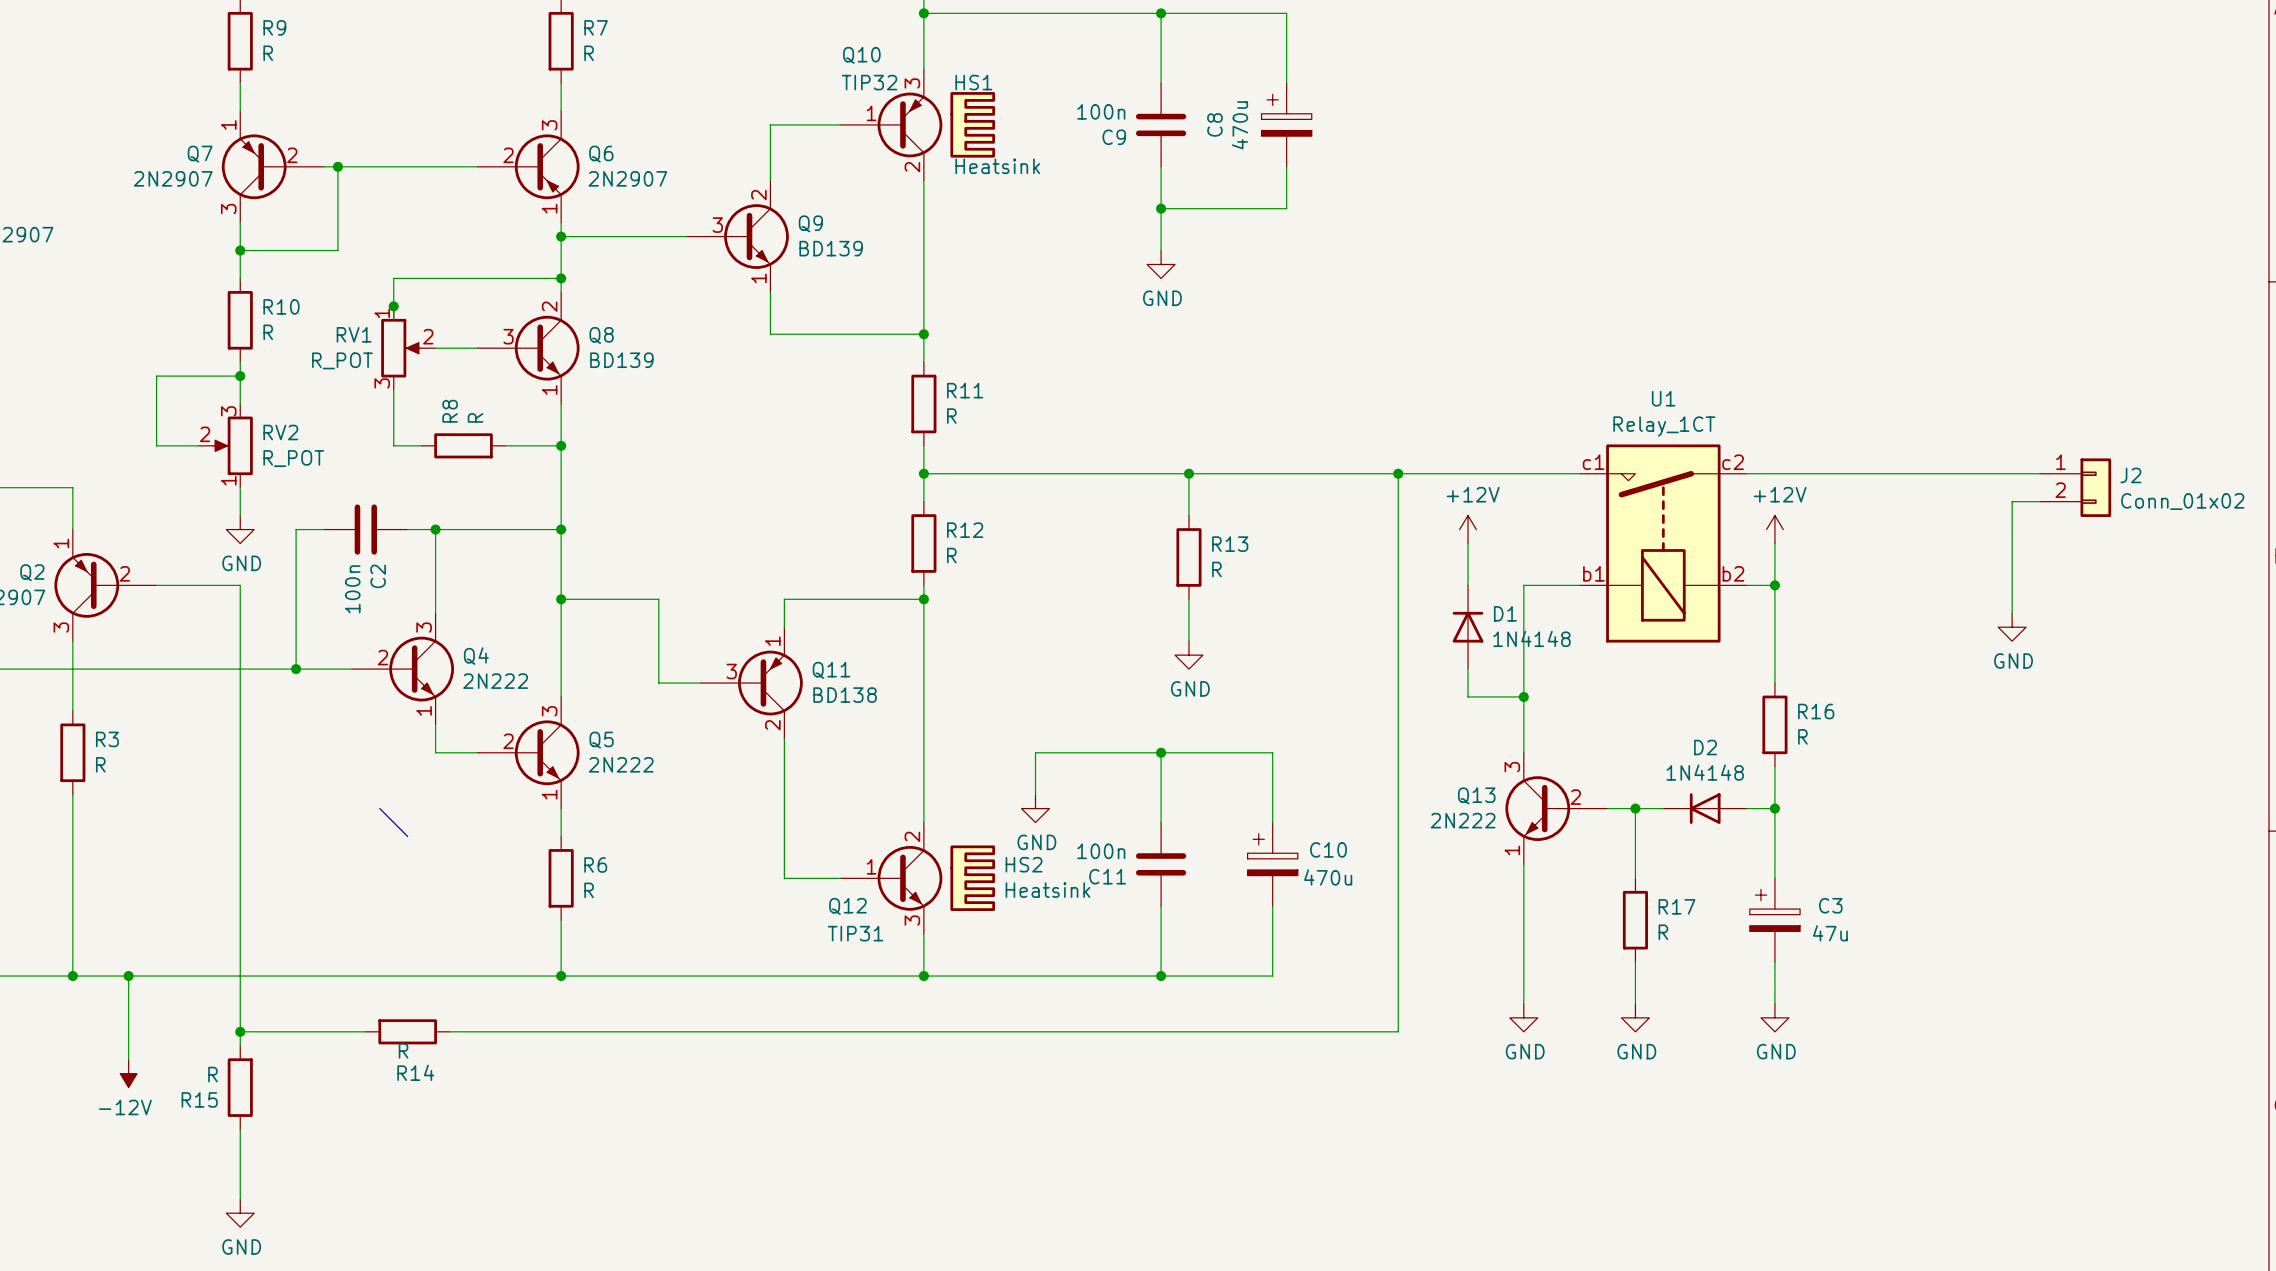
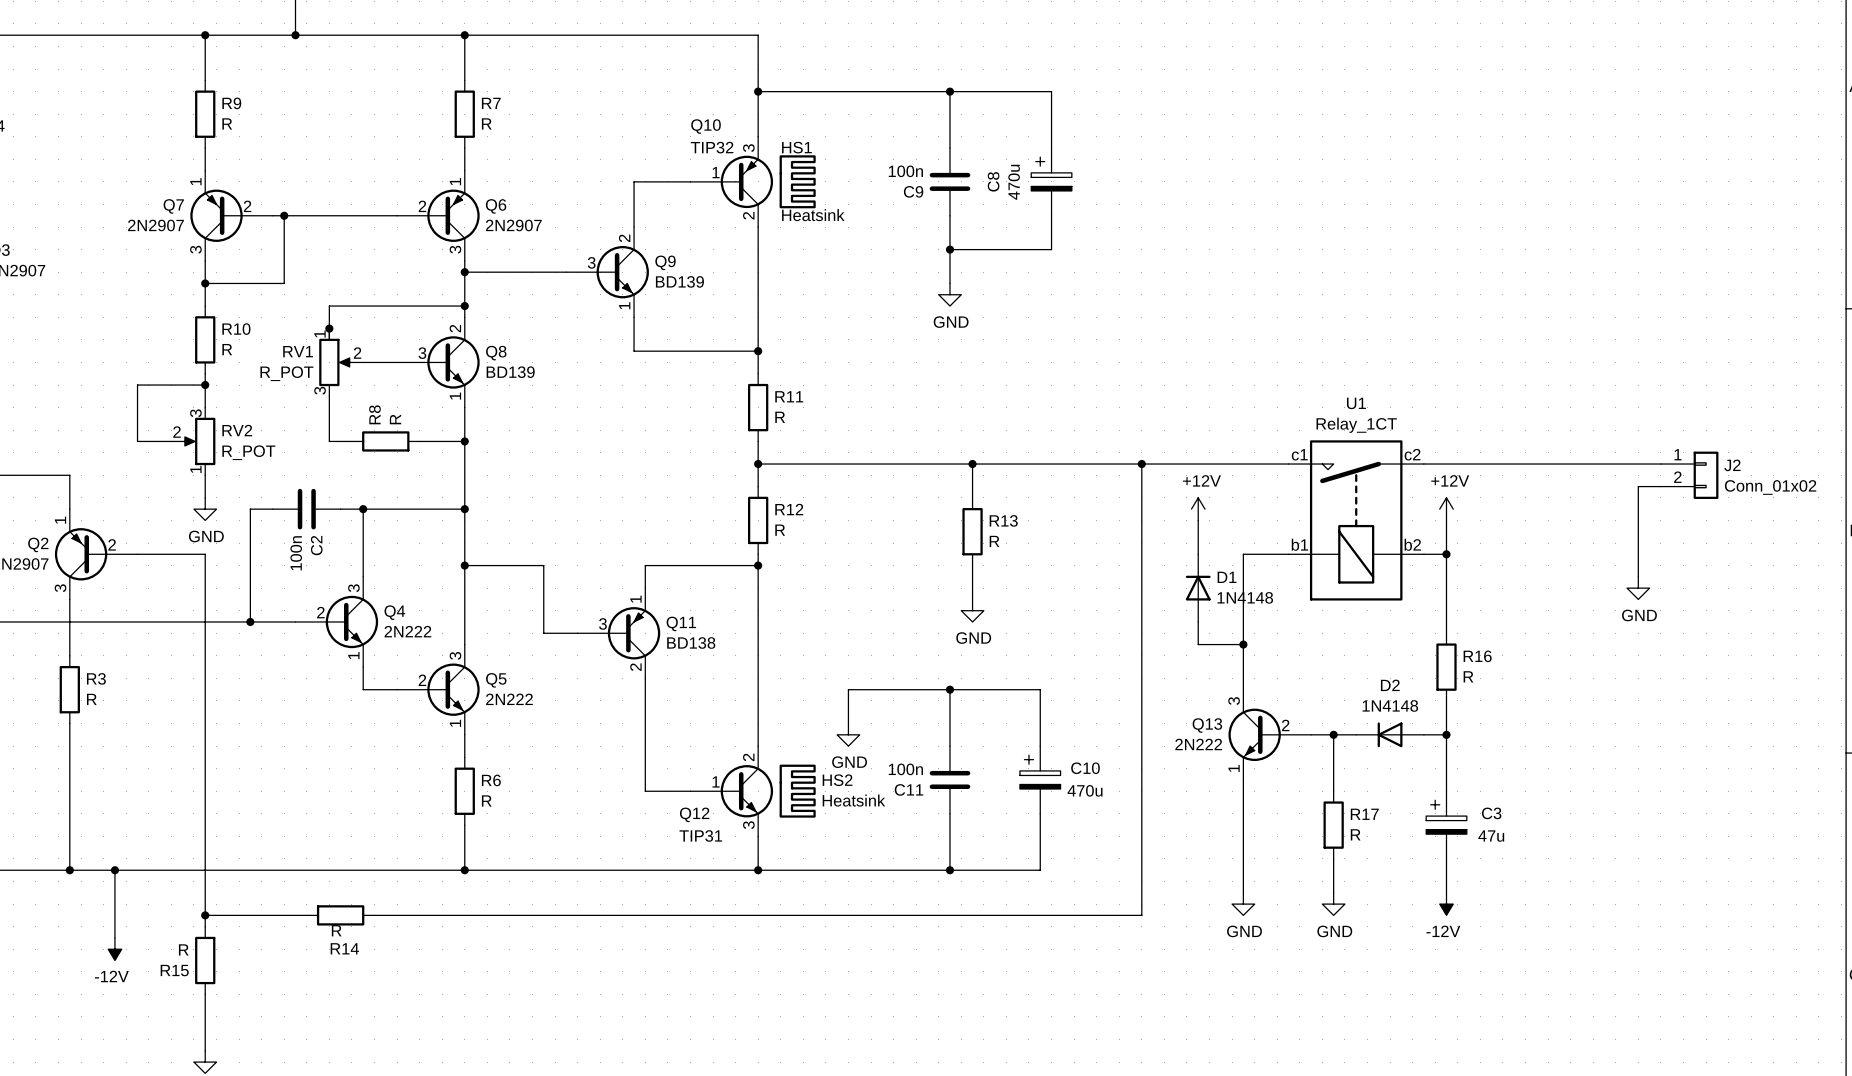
Q6 flip: as is (547, 166) -> up-down (453, 215)
bus: (379, 808) (407, 836) -> none
power symbol: GND (1774, 1017) -> -12V (1446, 904)

